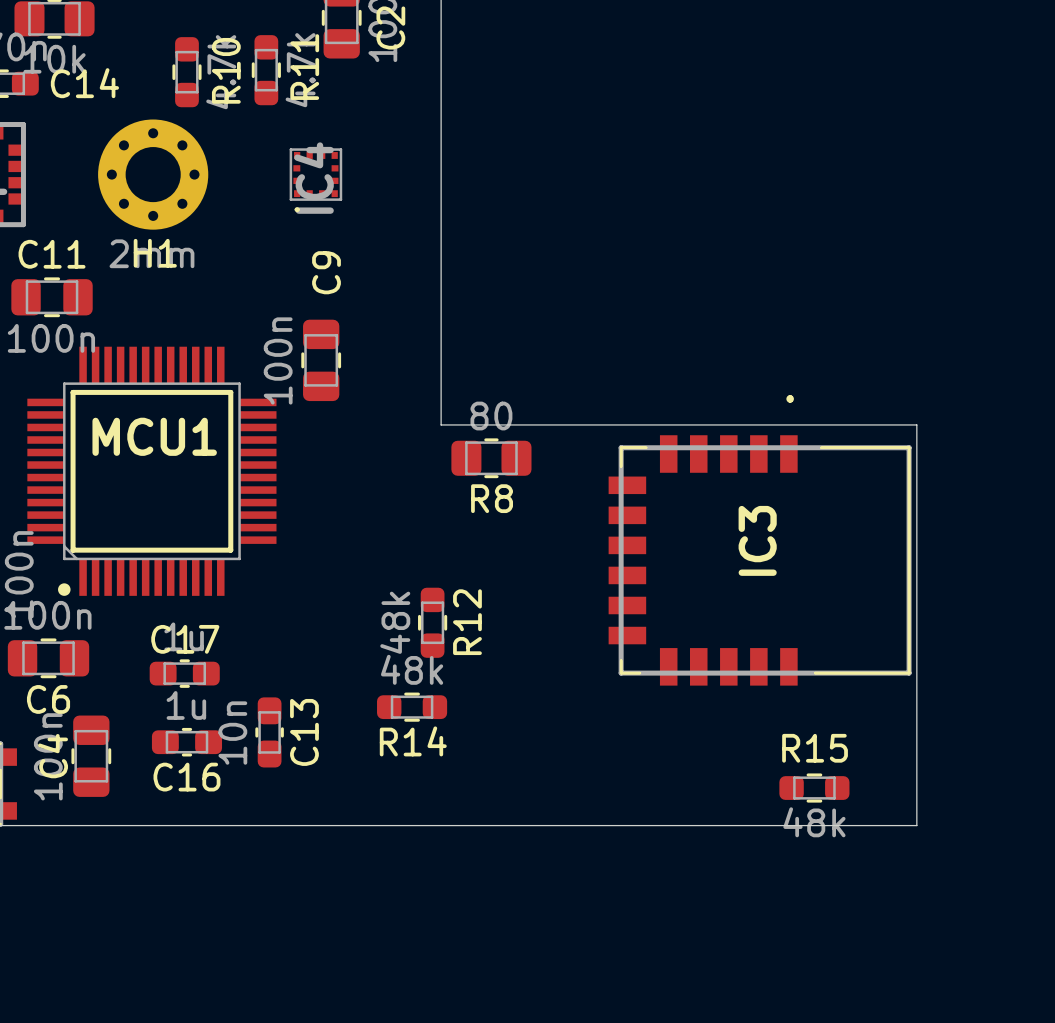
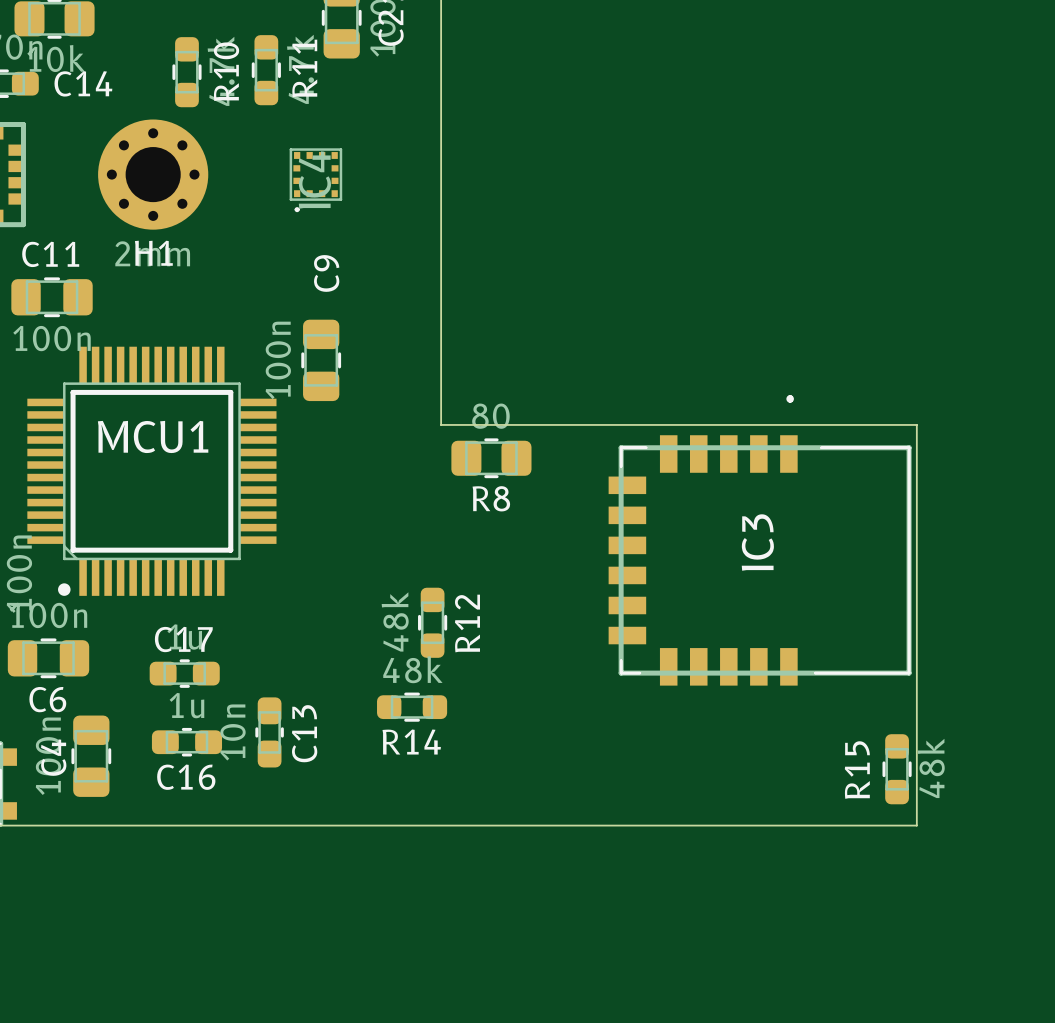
R15 name position: R15 (815, 748) -> R15 (857, 770)
R15 rotation: 0° (814, 788) -> 90° clockwise (897, 769)
R15 position: (814, 788) -> (897, 769)
R15 value position: 48k (814, 822) -> 48k (931, 768)

